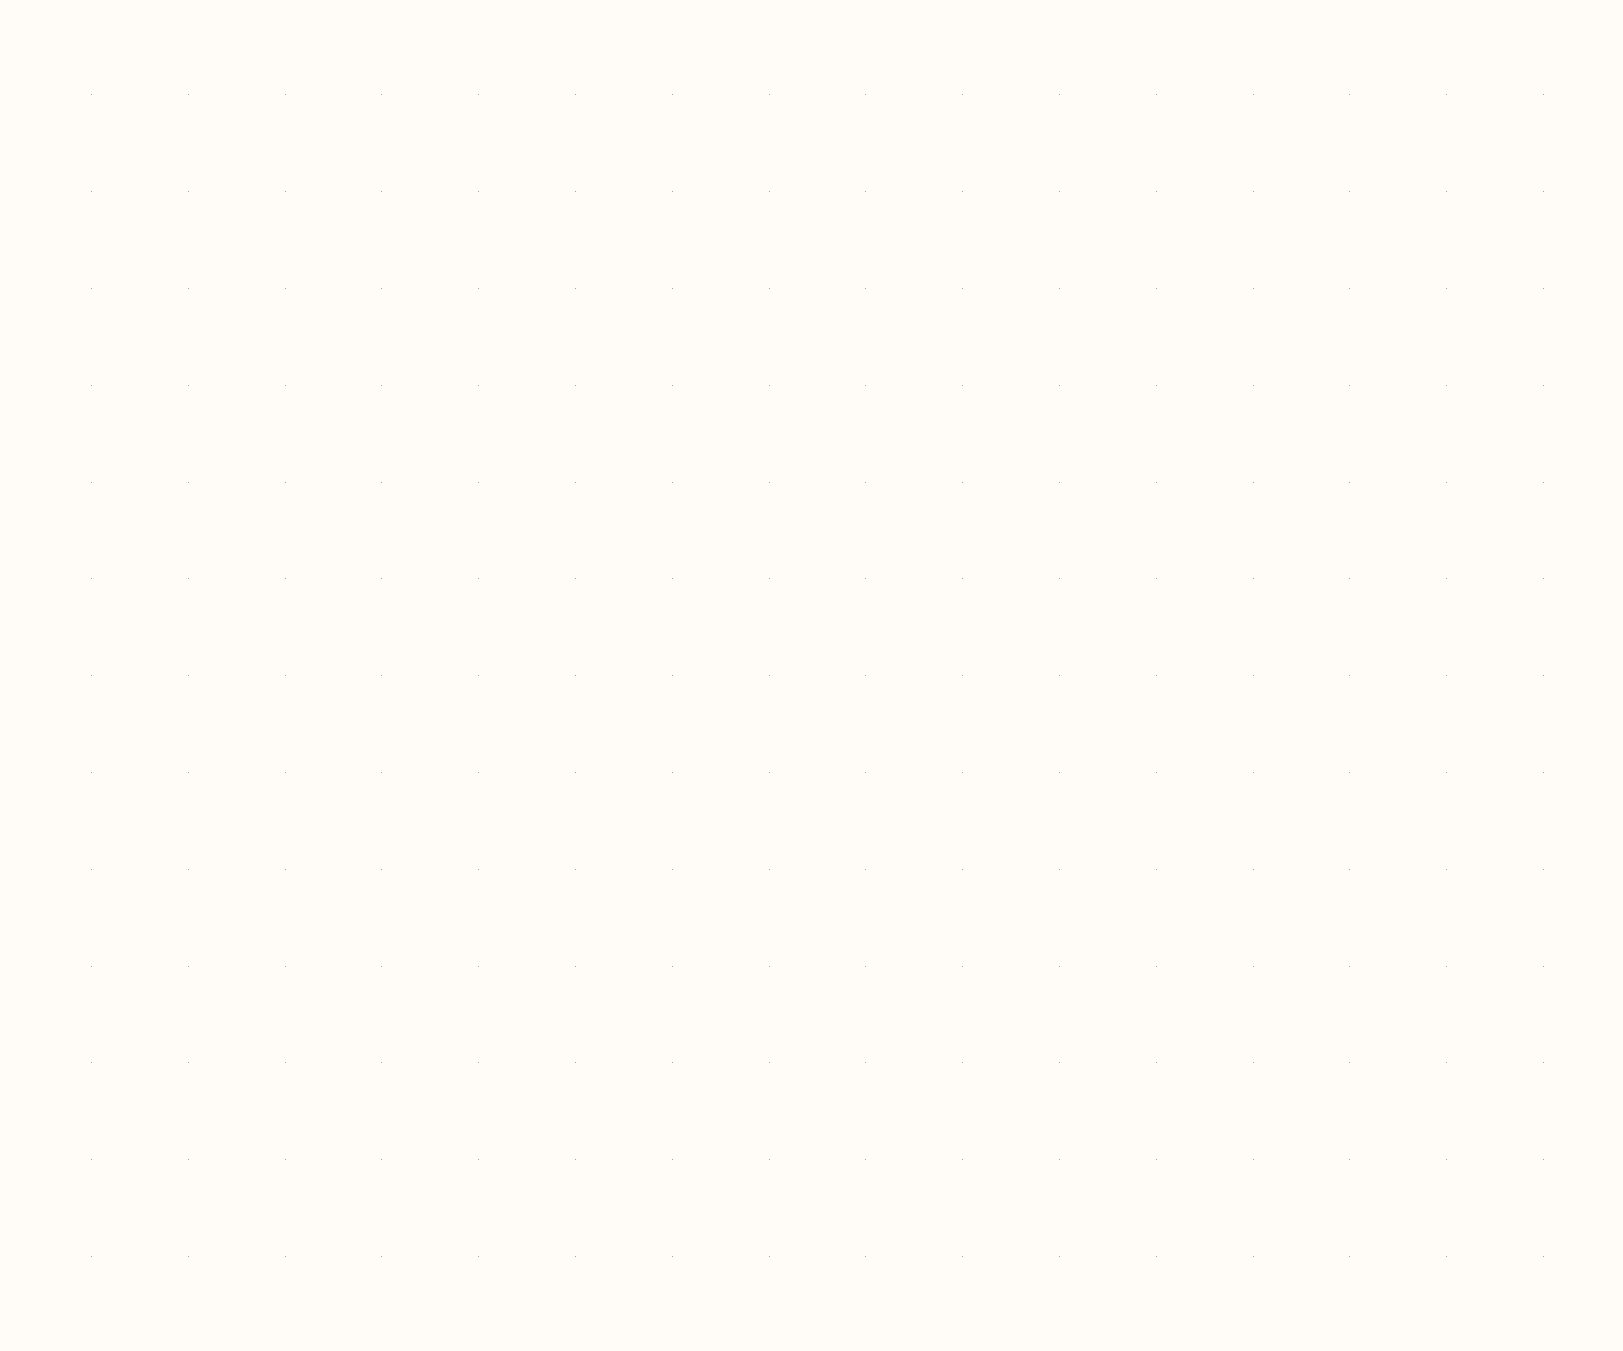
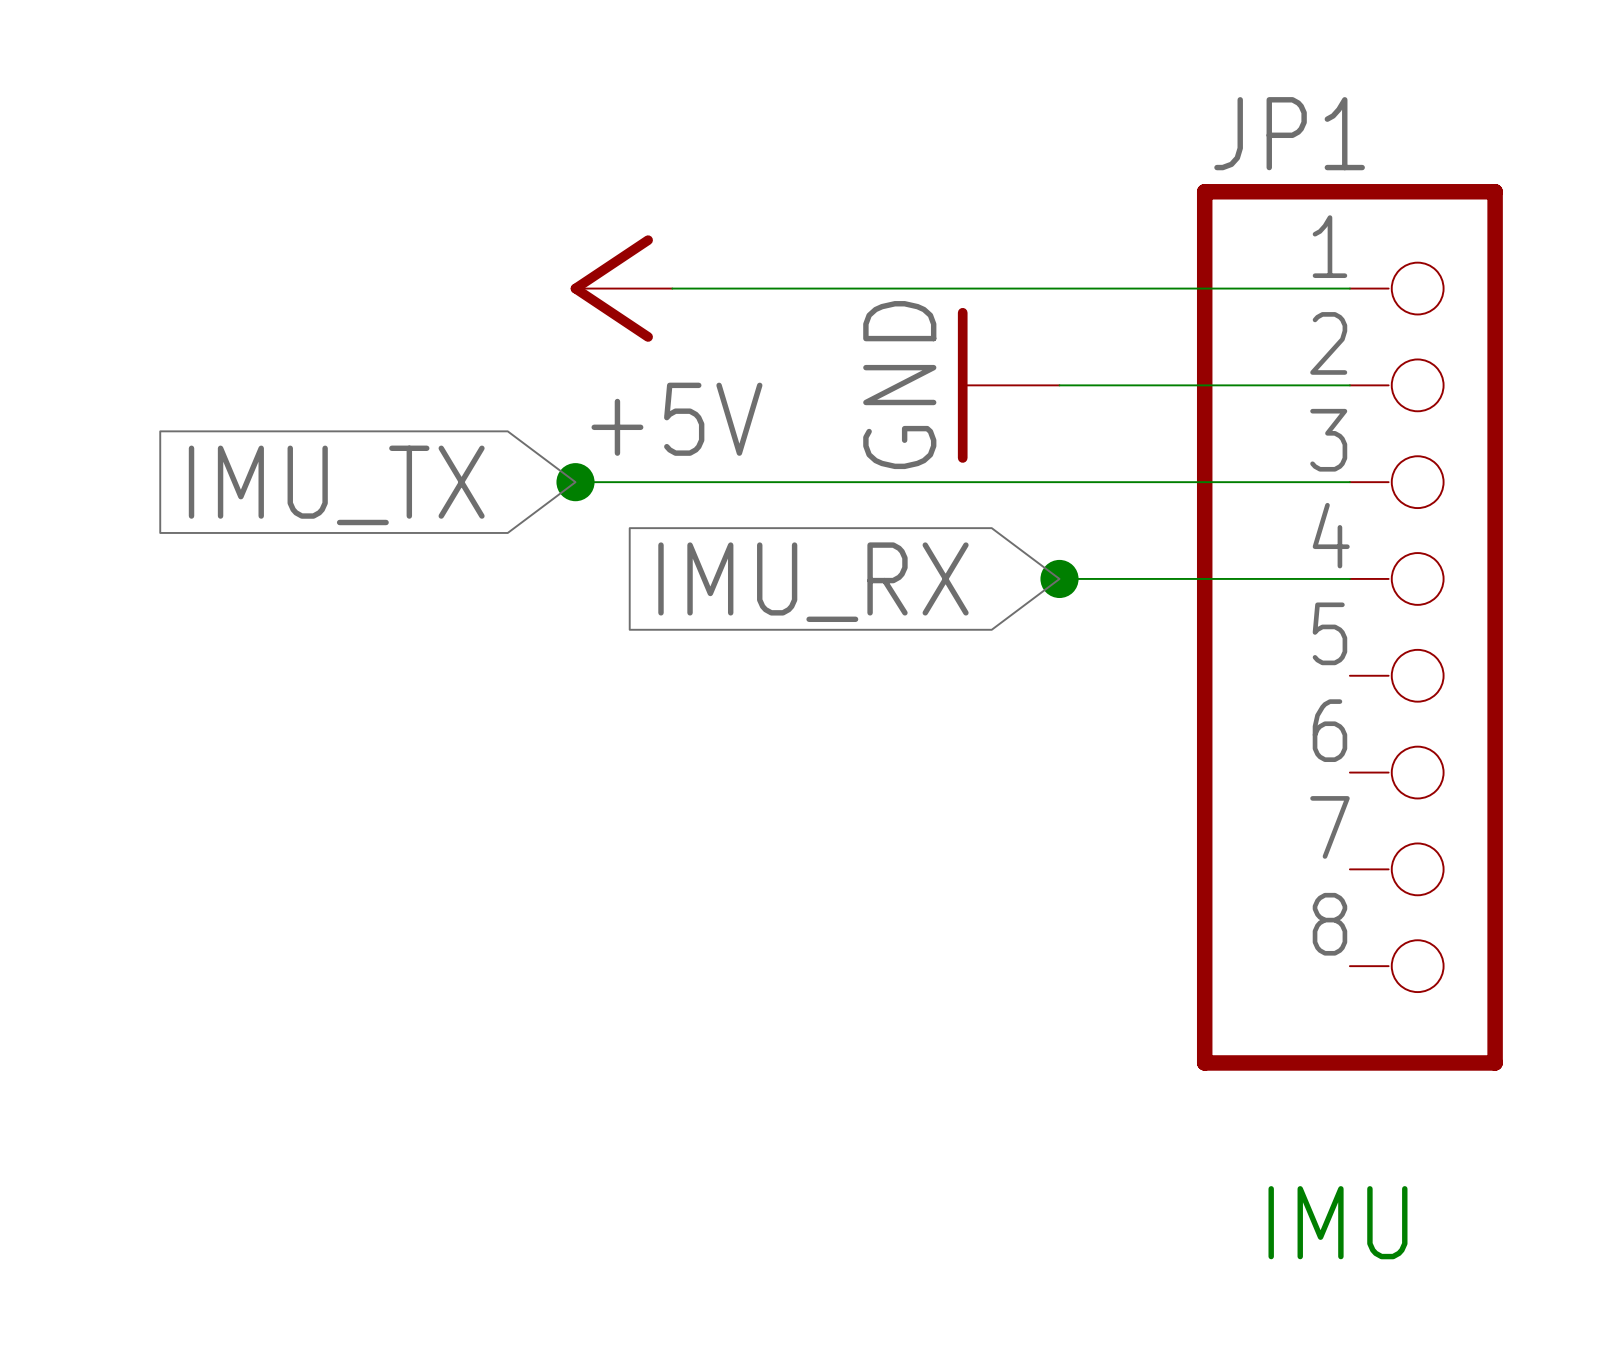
power symbol: none -> +5V (621, 288)
wire: none -> (672, 288) (1349, 288)
power symbol: none -> GND (1008, 385)
wire: none -> (1059, 385) (1349, 385)
global label: none -> IMU_TX (336, 485)
wire: none -> (575, 482) (1349, 482)
junction: none -> (575, 482)
wire: none -> (1059, 578) (1349, 578)
junction: none -> (1059, 578)
global label: none -> IMU_RX (813, 582)
JP1: none -> (1349, 627)
text: none -> IMU (1337, 1222)

